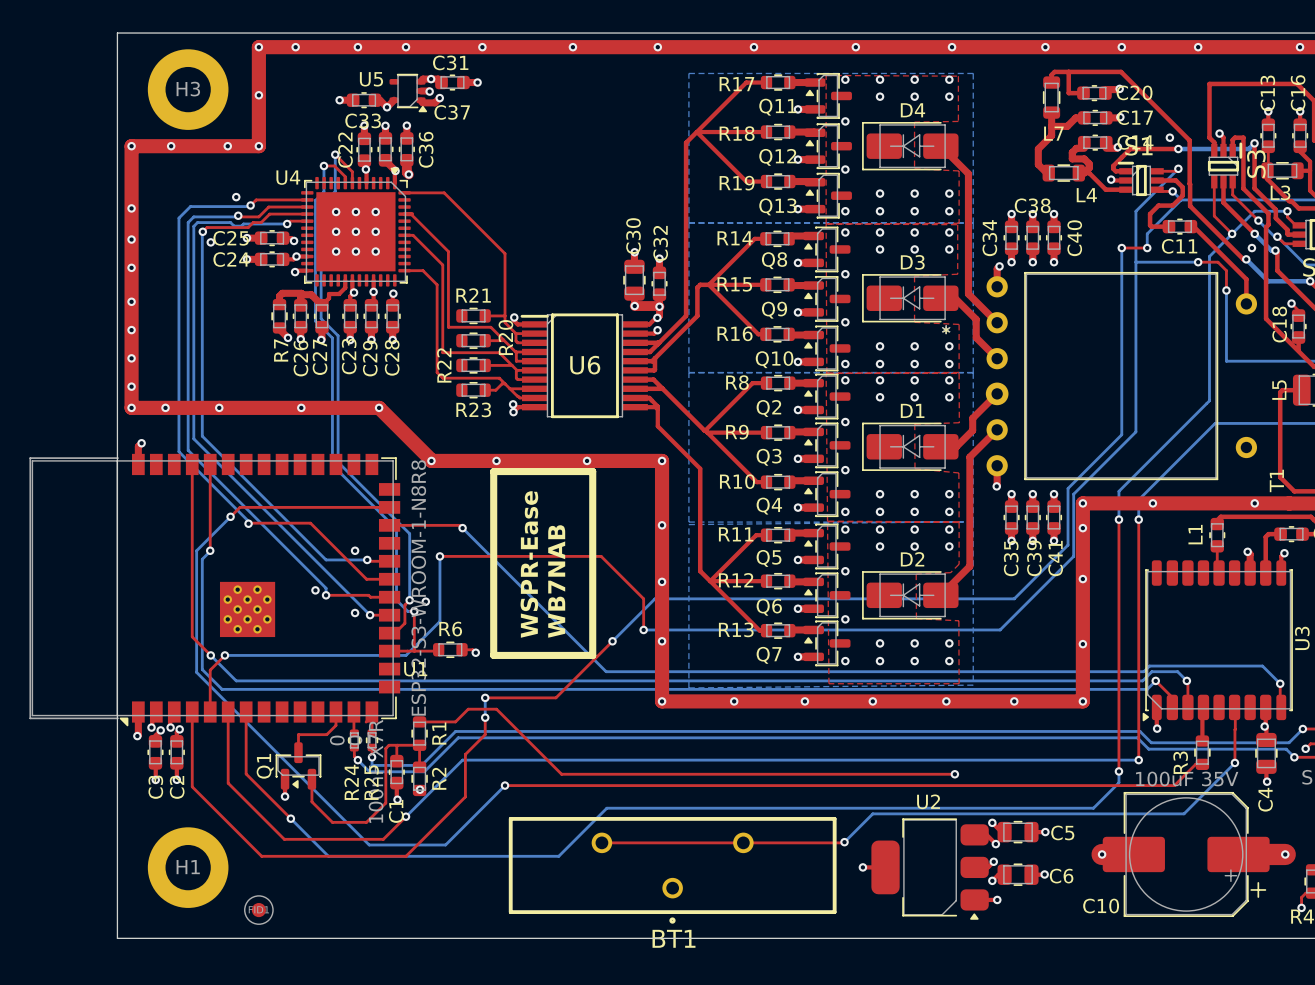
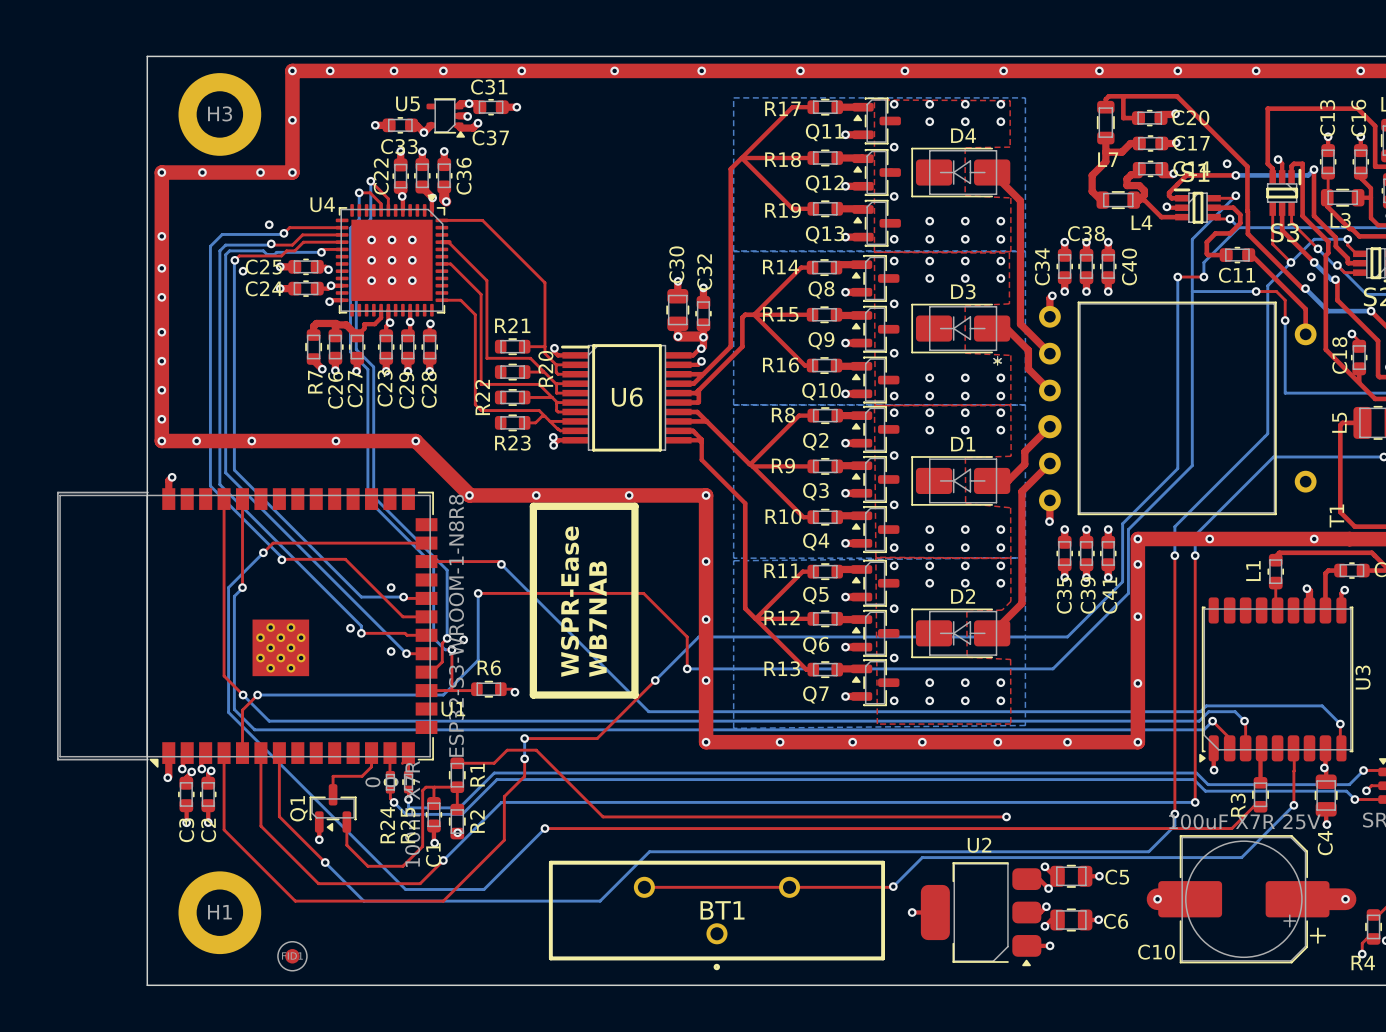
S3 name rotation: 0° (1256, 164) -> 90° clockwise (1285, 232)
S3 name position: S3 (1256, 164) -> S3 (1285, 232)
C10 value: 100uF 35V (1187, 778) -> 100uF X7R 25V (1244, 821)
BT1 name position: BT1 (673, 938) -> BT1 (722, 910)

